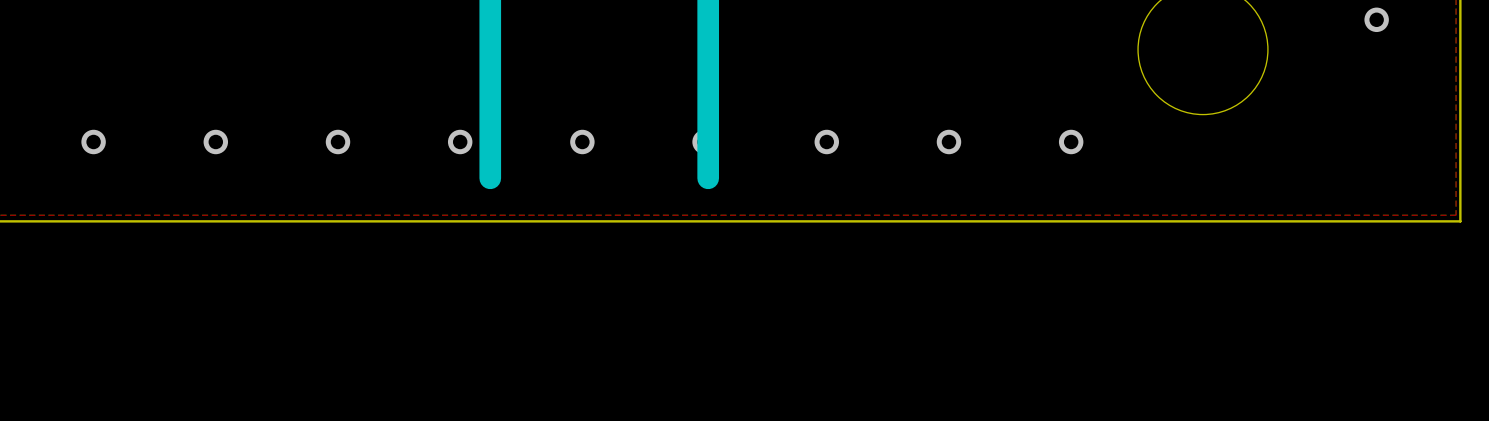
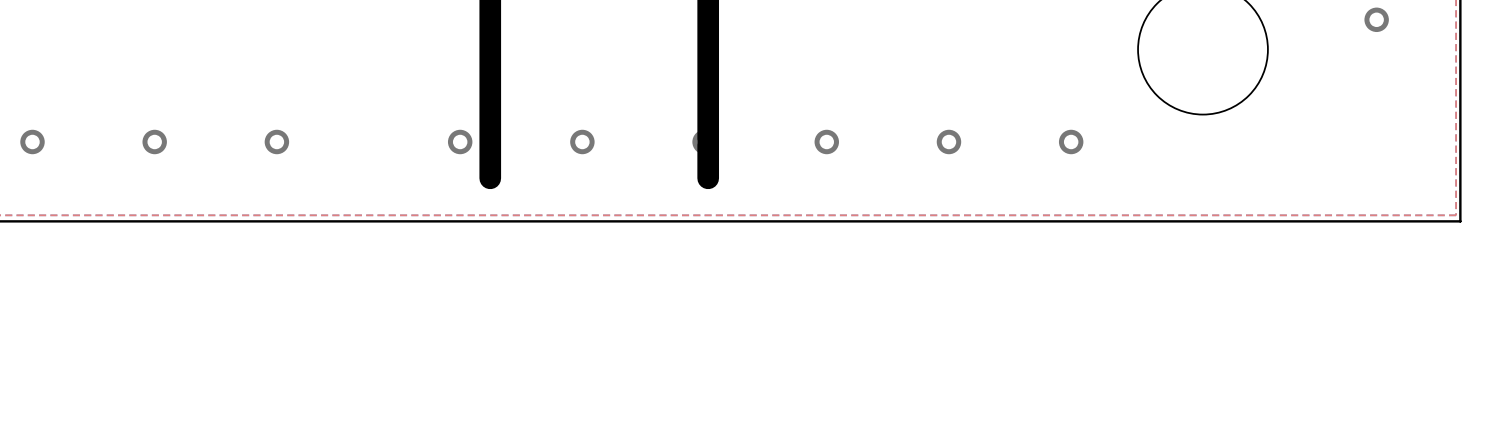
via: none -> (32, 141)
via: (93, 141) -> none
via: none -> (154, 141)
via: (215, 141) -> none
via: none -> (276, 141)
via: (337, 141) -> none

